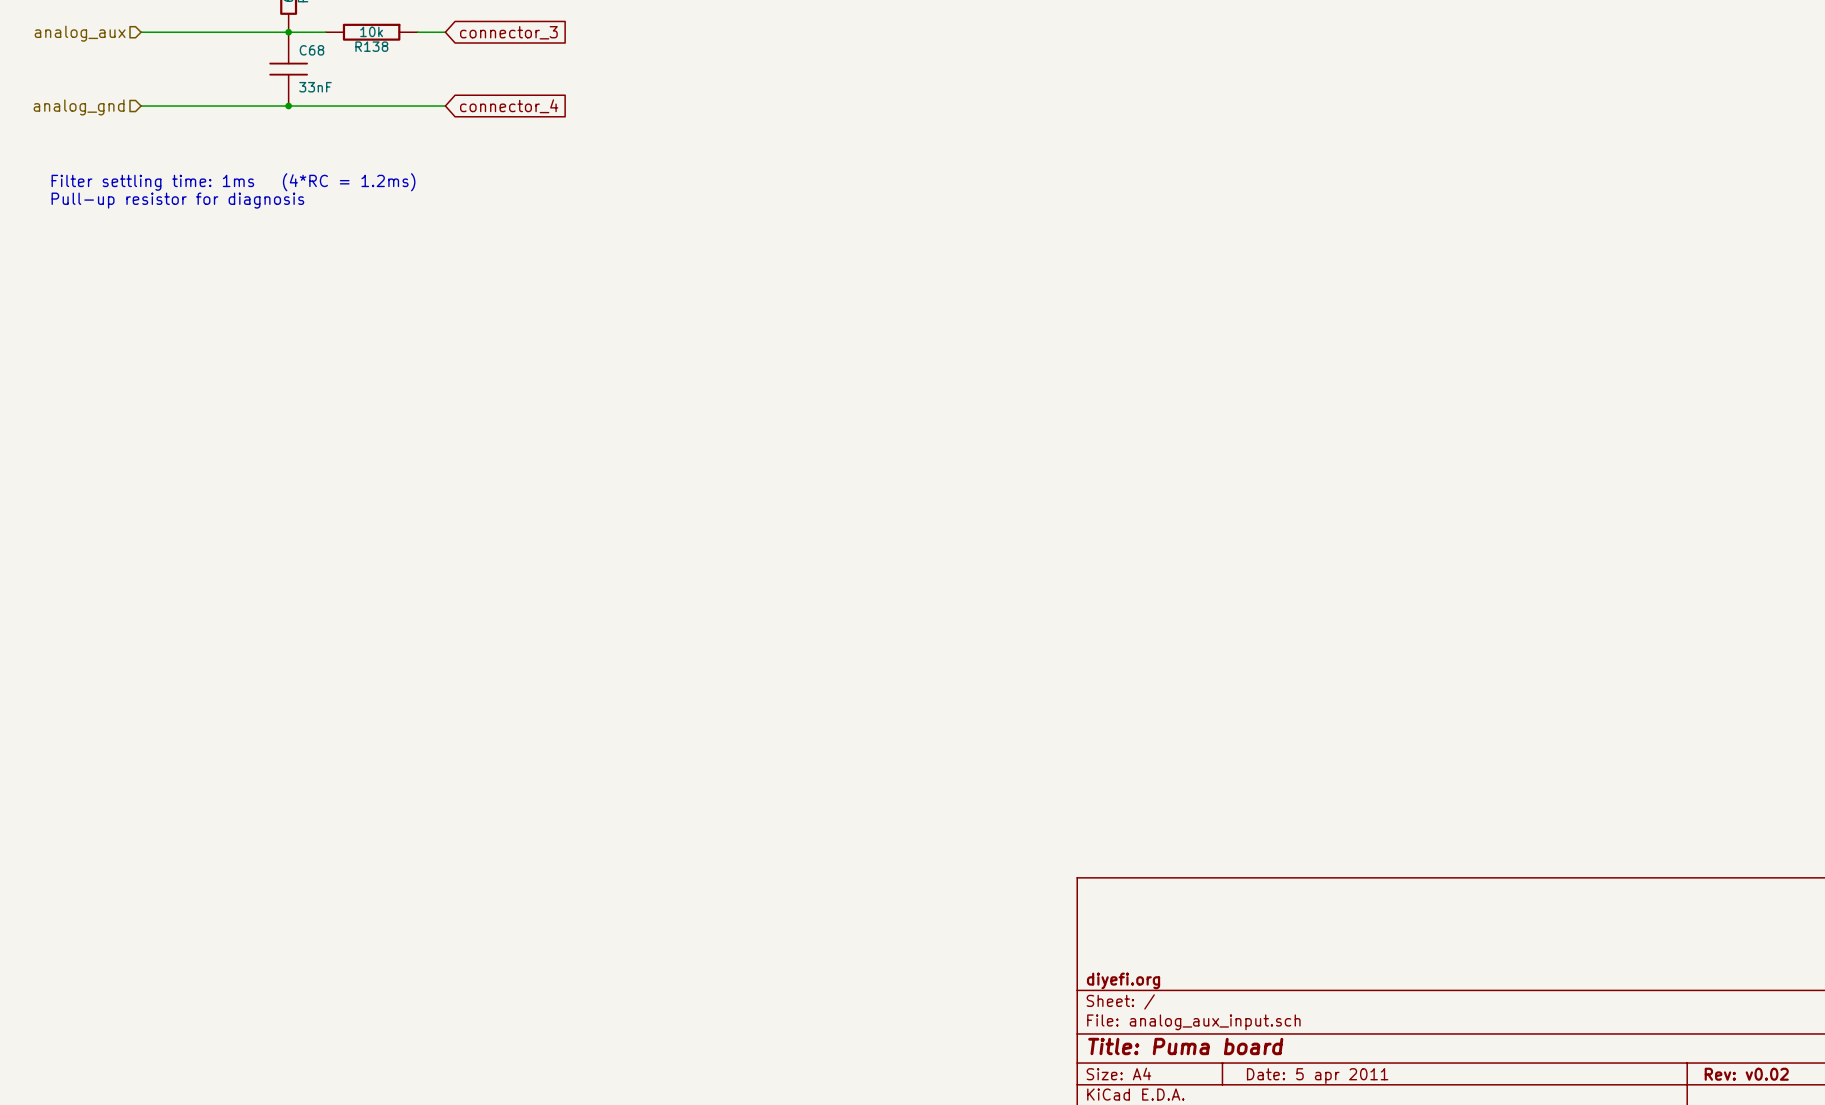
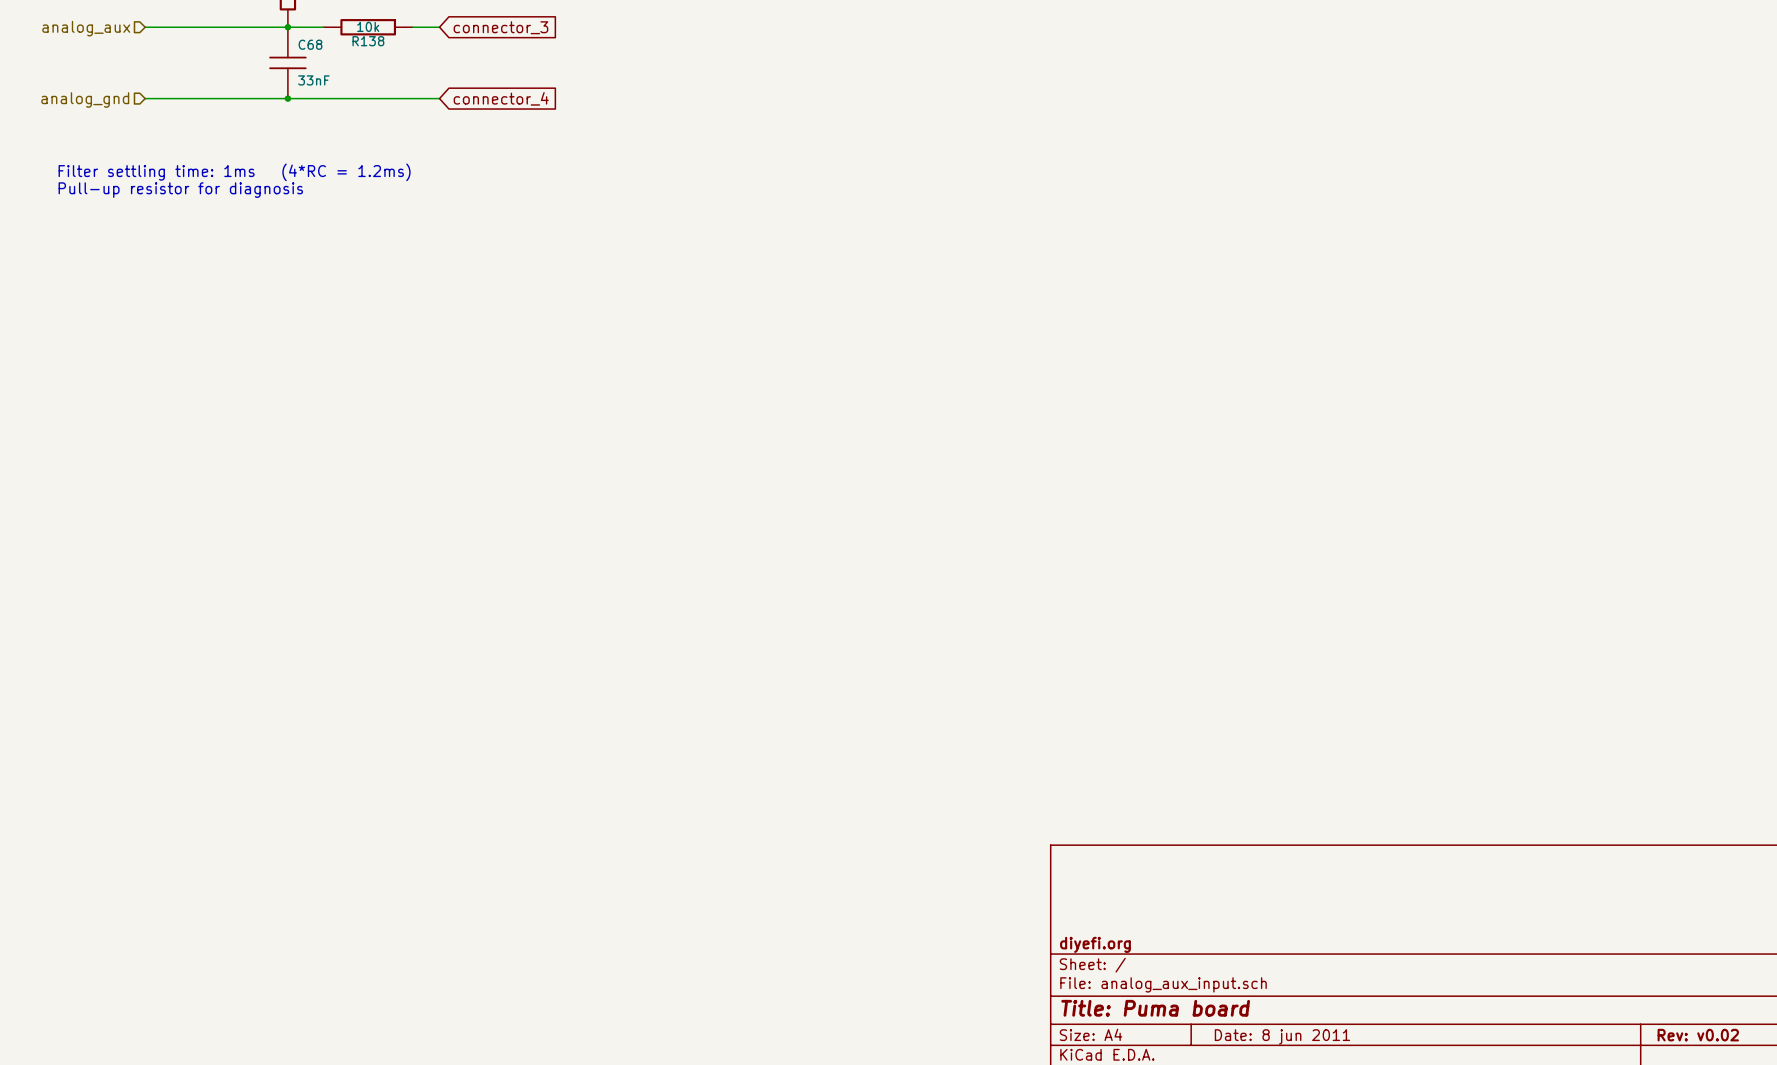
title block: Date: 5 apr 2011 (1317, 1076) -> Date: 8 jun 2011 (1282, 1036)

